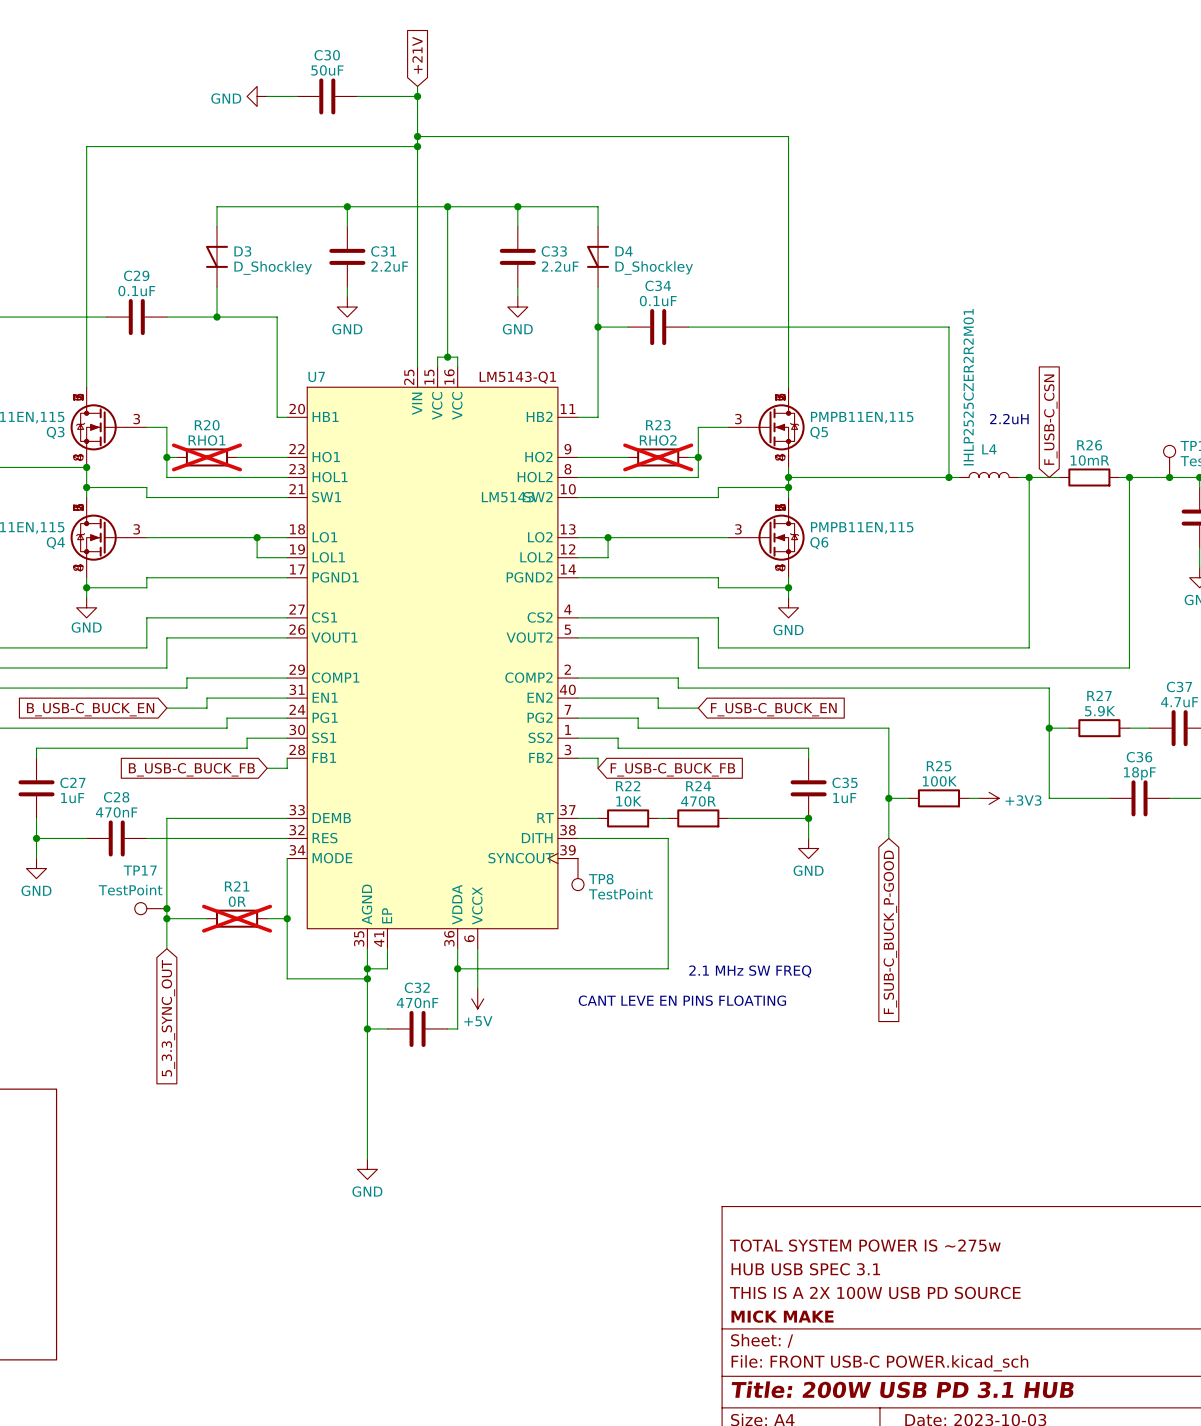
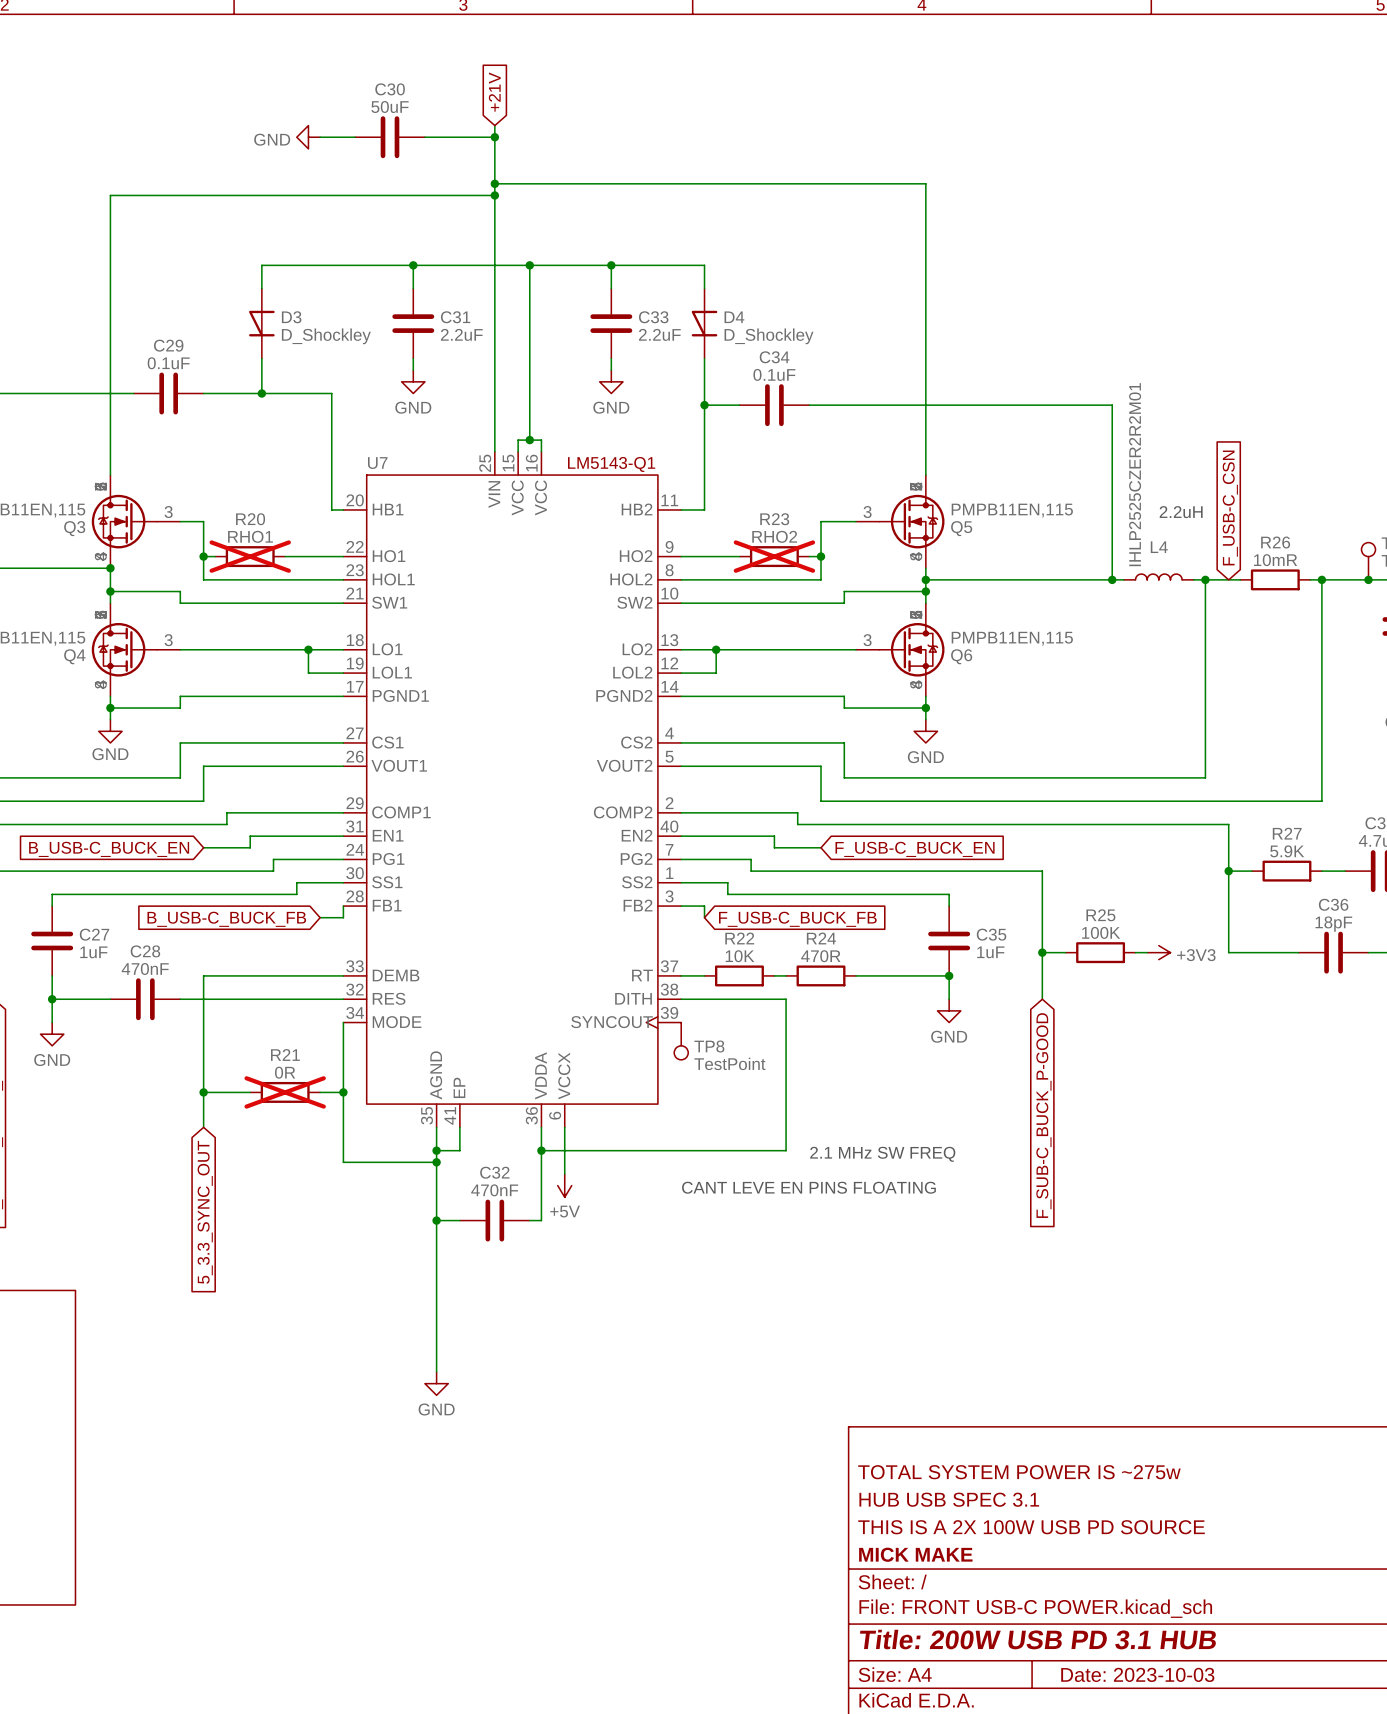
U7 value: LM5143 (507, 497) -> none
TP17: TestPoint (150, 908) -> none
junction: (166, 908) -> none

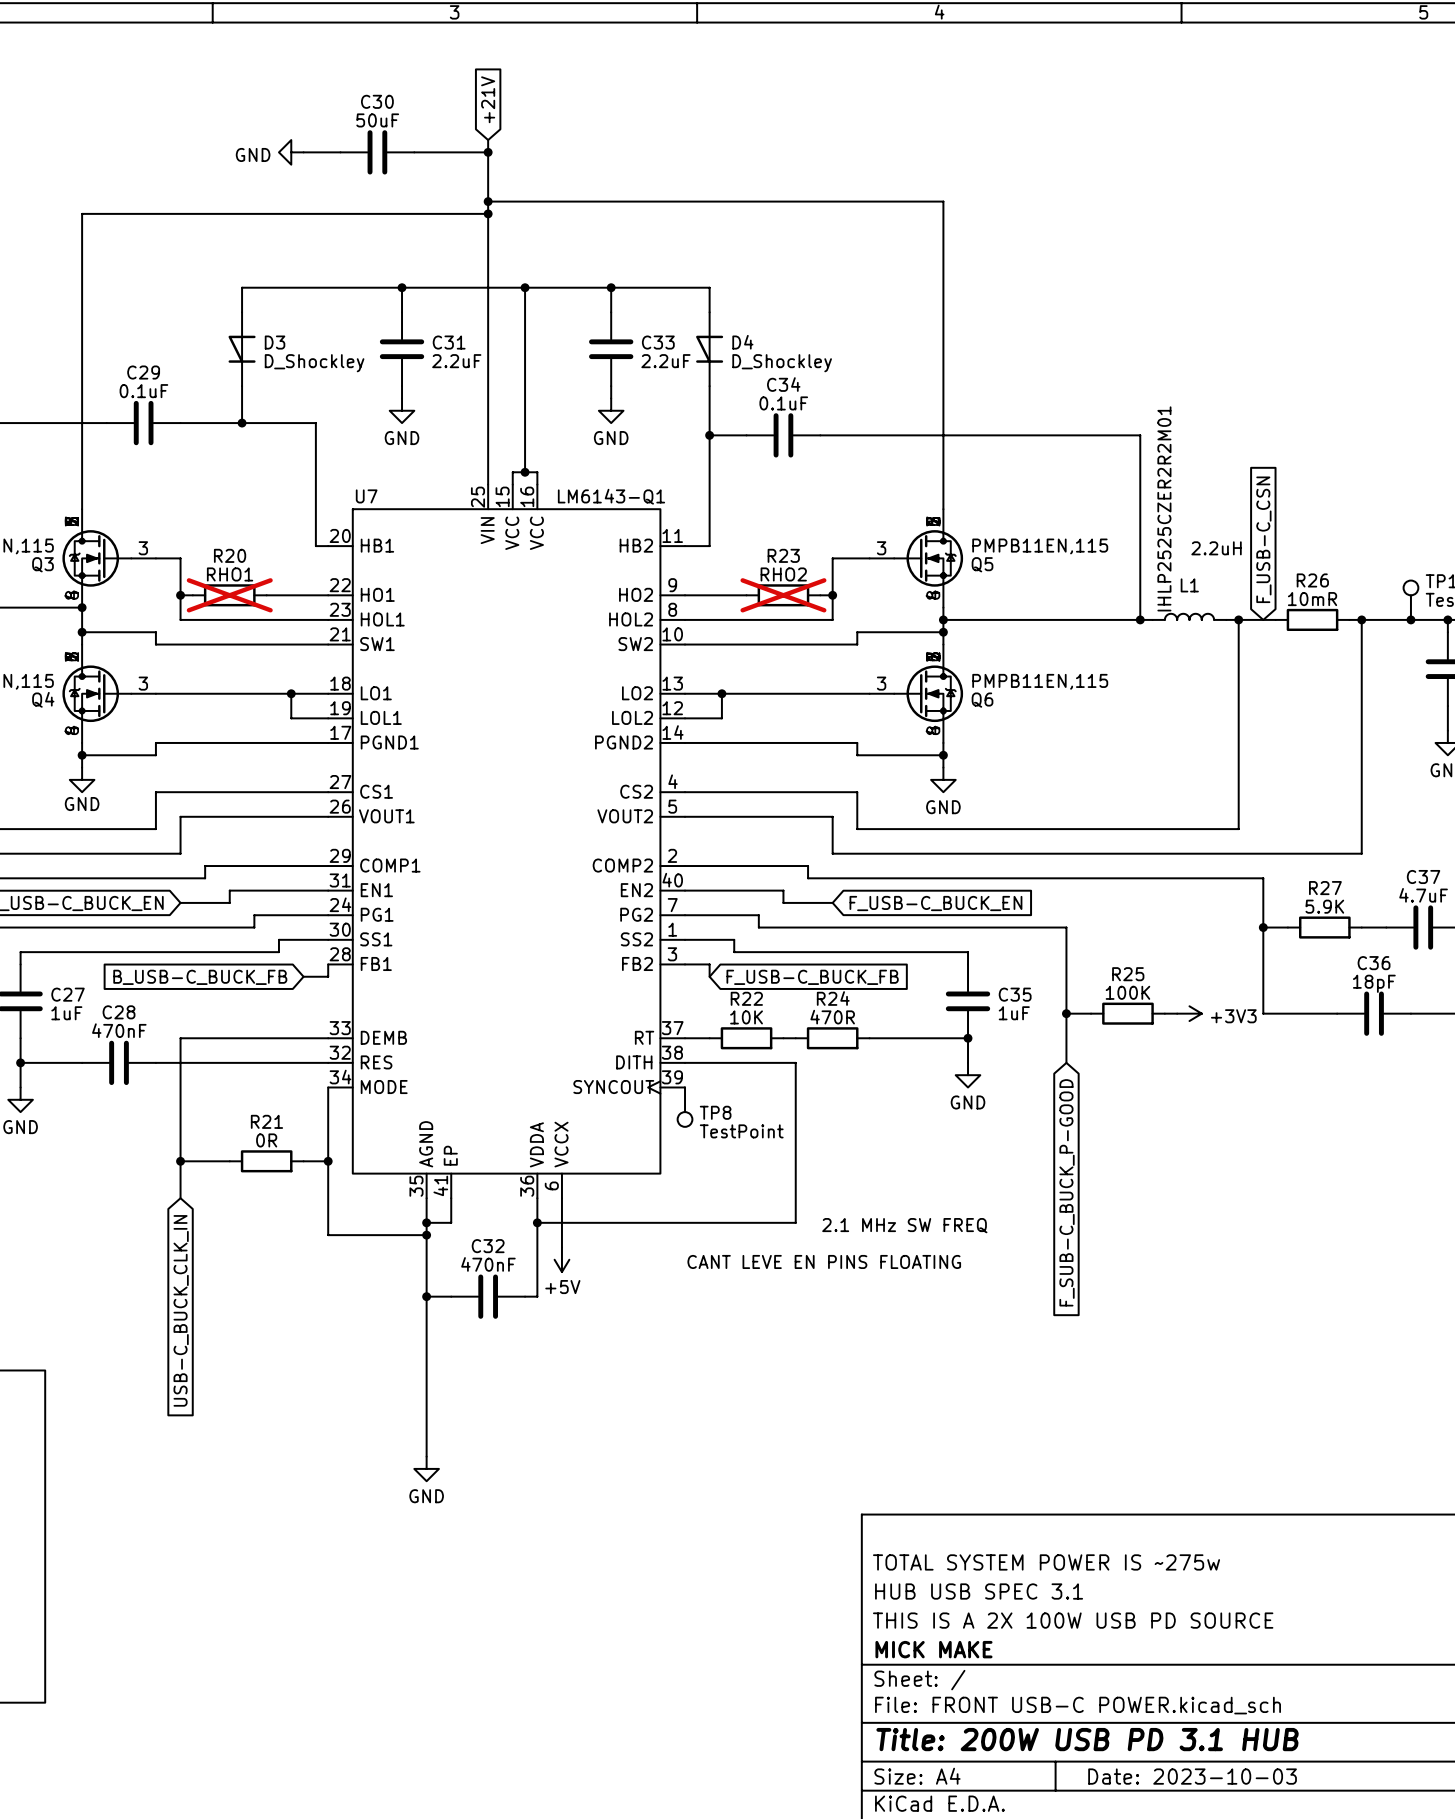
U7 text: LM5143-Q1 (611, 464) -> LM6143-Q1 (611, 496)
L4 name: L4 (1159, 547) -> L1 (1189, 585)
R21 do-not-place cross: (285, 1092) -> none
global label: 5_3.3_SYNC_OUT (205, 1212) -> USB-C_BUCK_CLK_IN (181, 1310)

